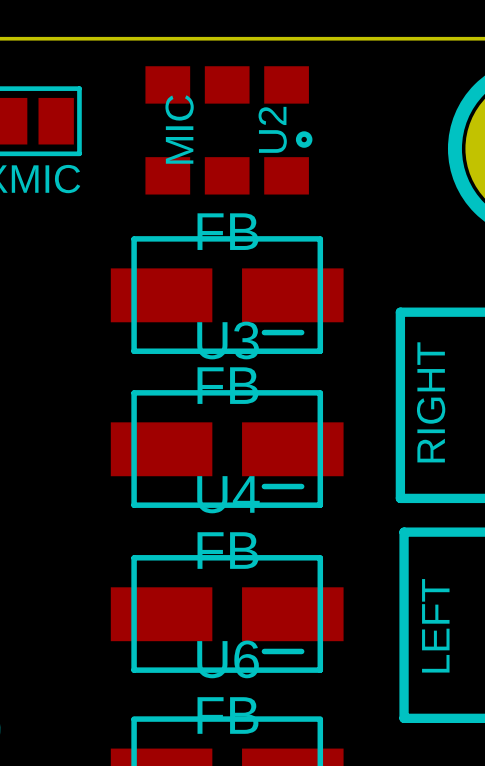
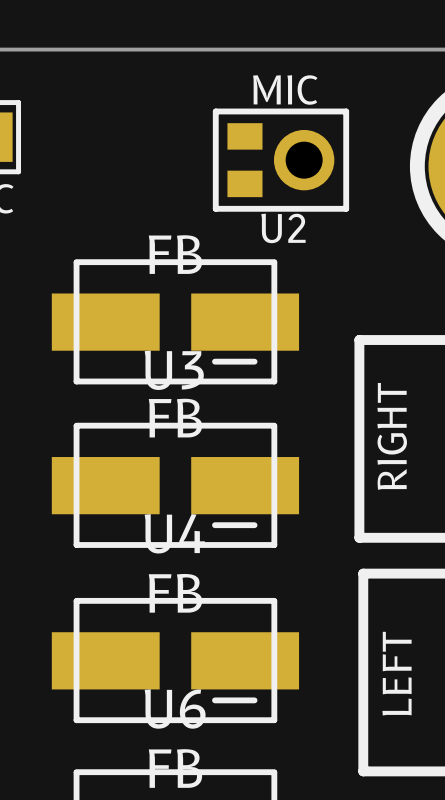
U2 footprint: [145, 66, 313, 195] -> [212, 108, 350, 212]
U2 value position: MIC (179, 129) -> MIC (285, 89)
U2 name position: U2 (272, 129) -> U2 (283, 228)

